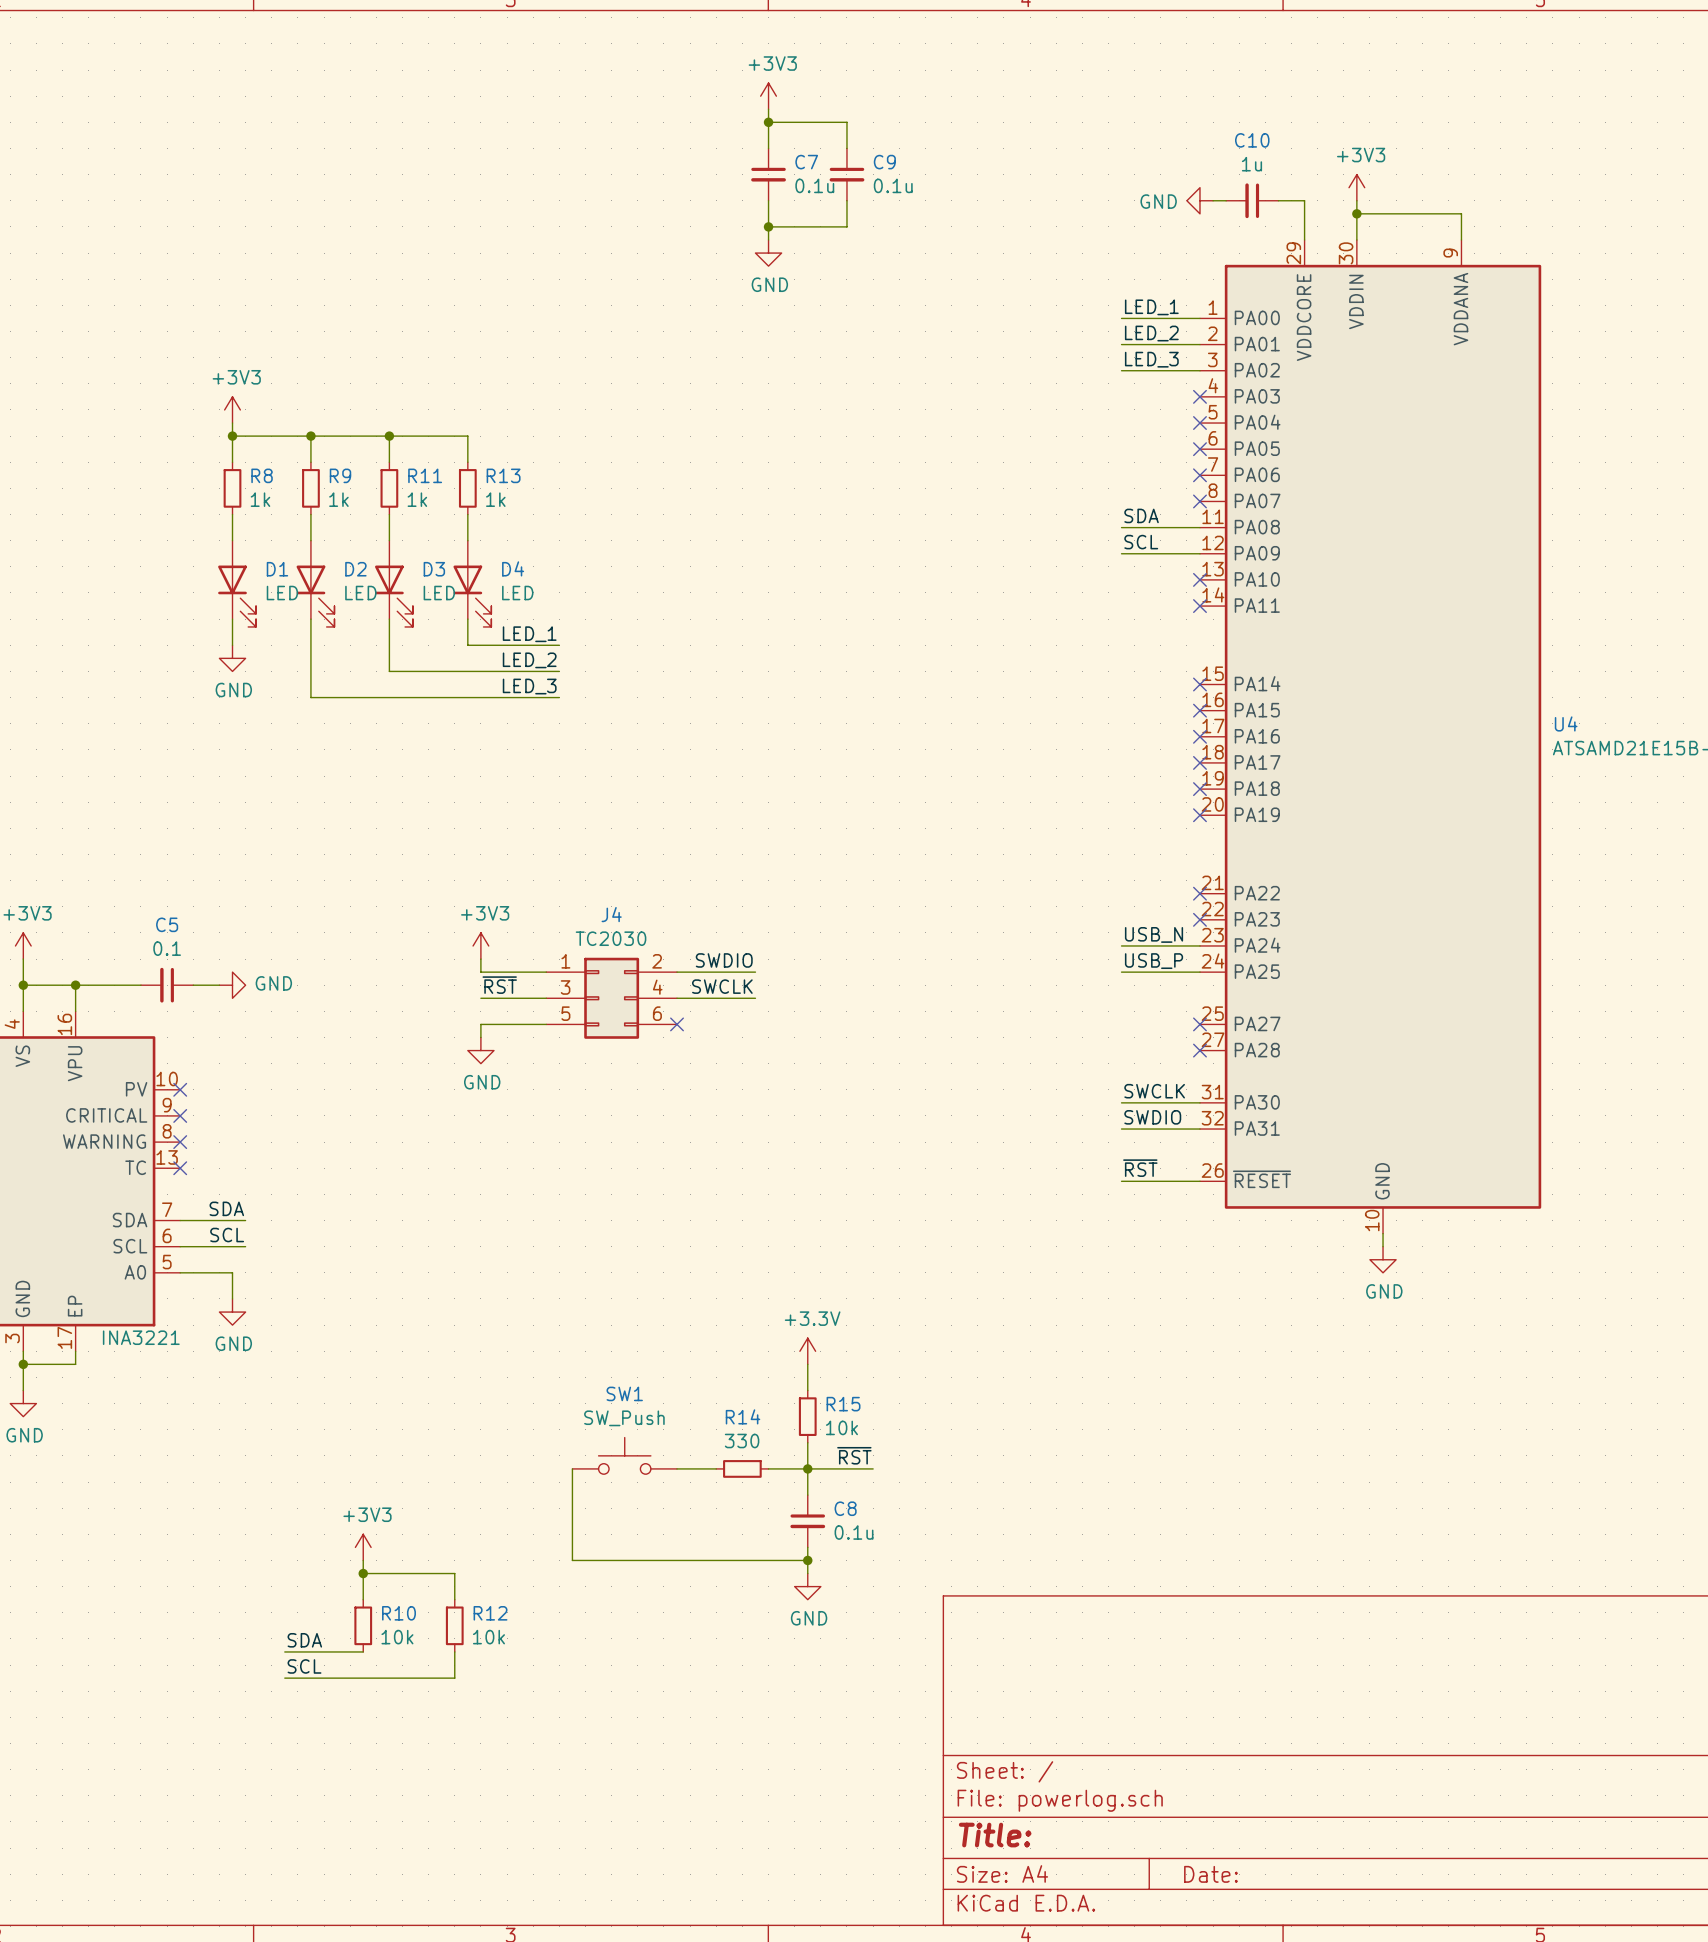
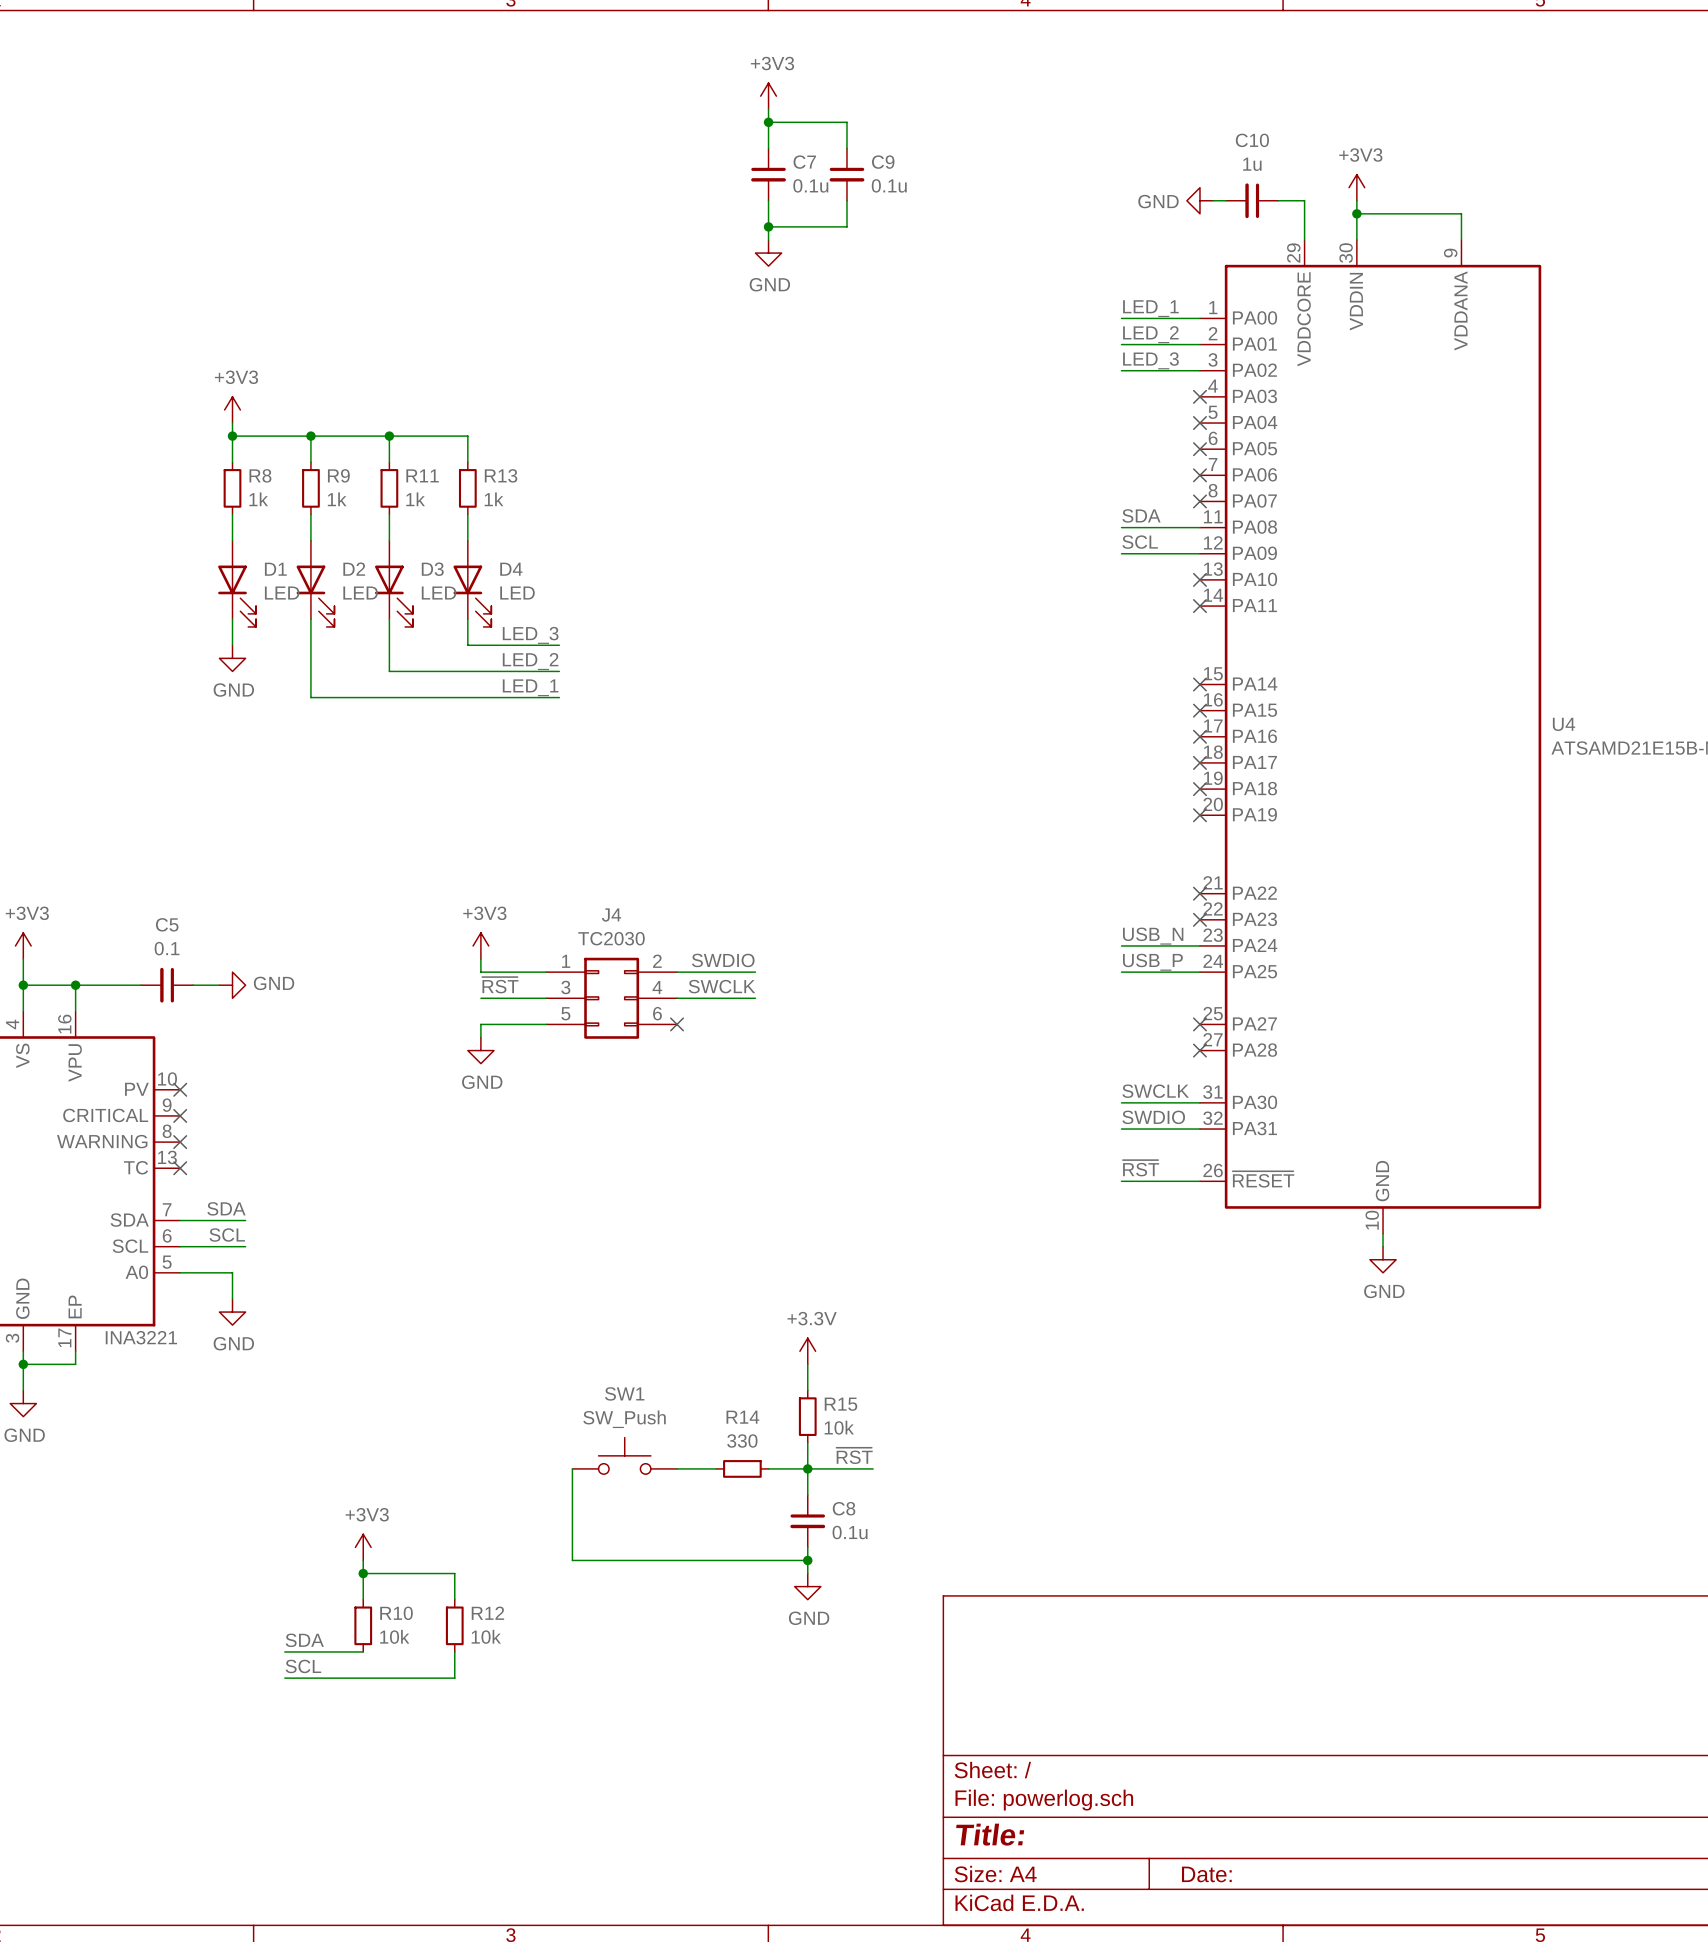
label: LED_1 (529, 634) -> LED_3 (530, 635)
label: LED_3 (529, 686) -> LED_1 (530, 687)

